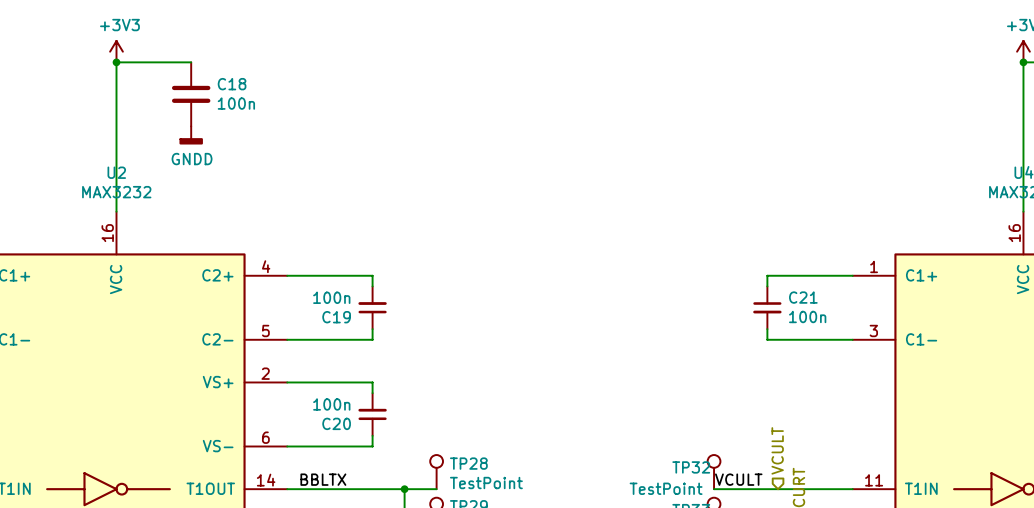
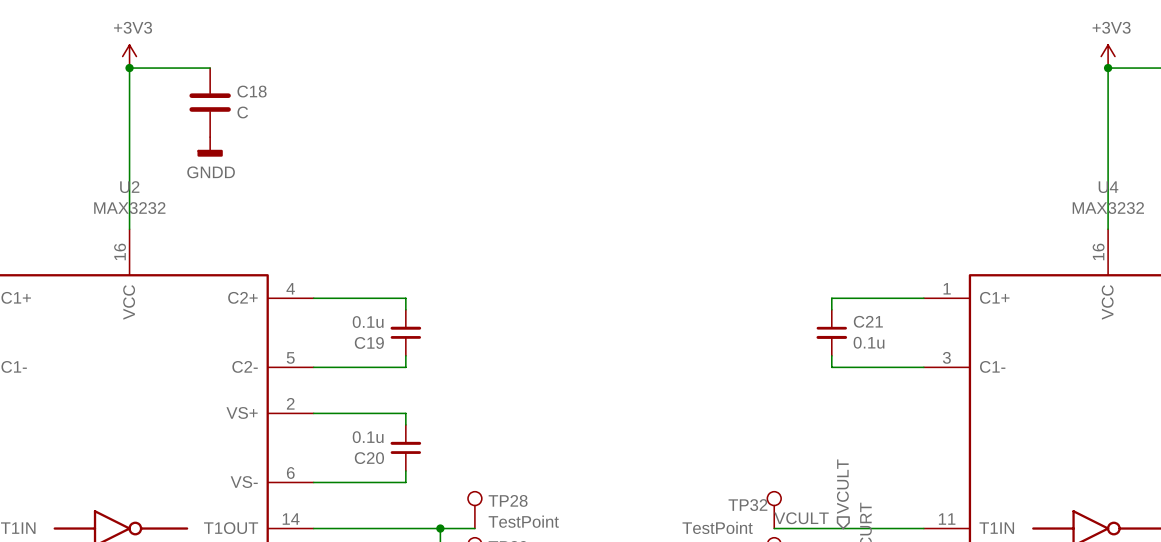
C18 value: 100n (236, 103) -> C (242, 112)
C19 value: 100n (331, 297) -> 0.1u (368, 322)
C21 value: 100n (807, 316) -> 0.1u (869, 342)
C20 value: 100n (331, 404) -> 0.1u (368, 437)
label: BBLTX (323, 479) -> none

